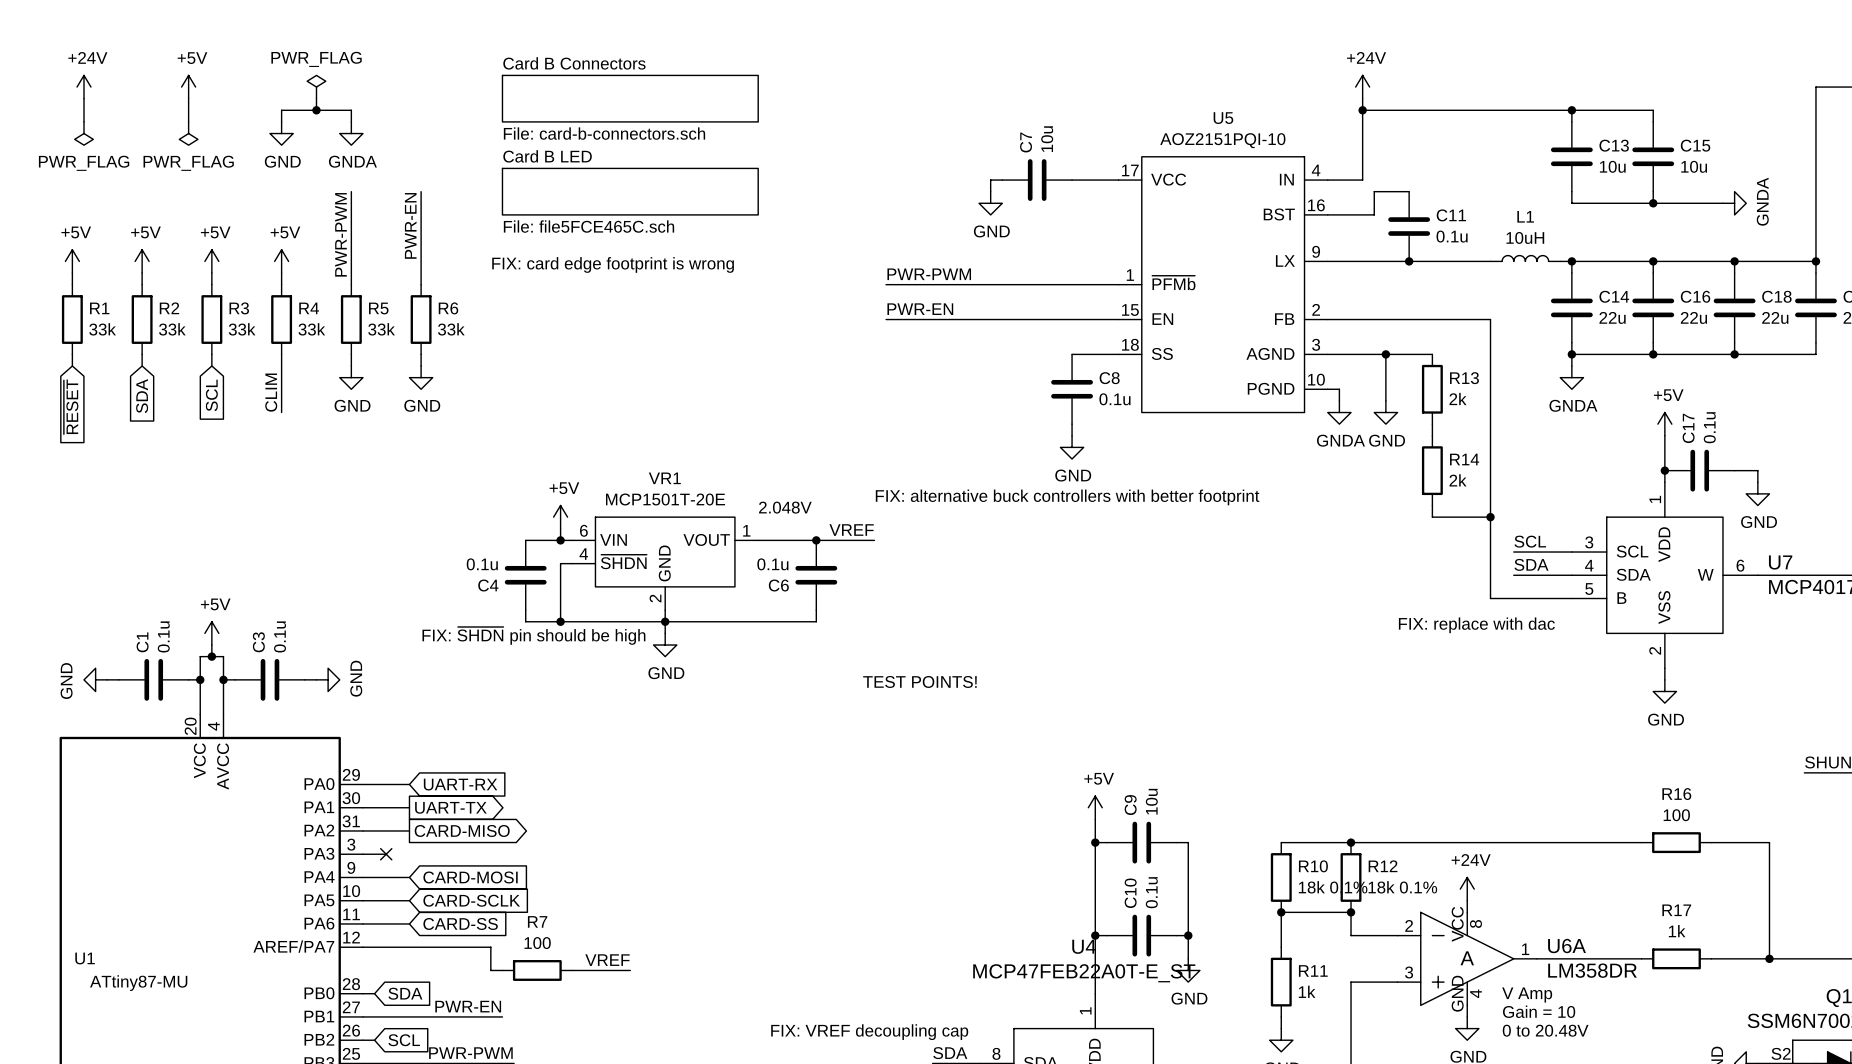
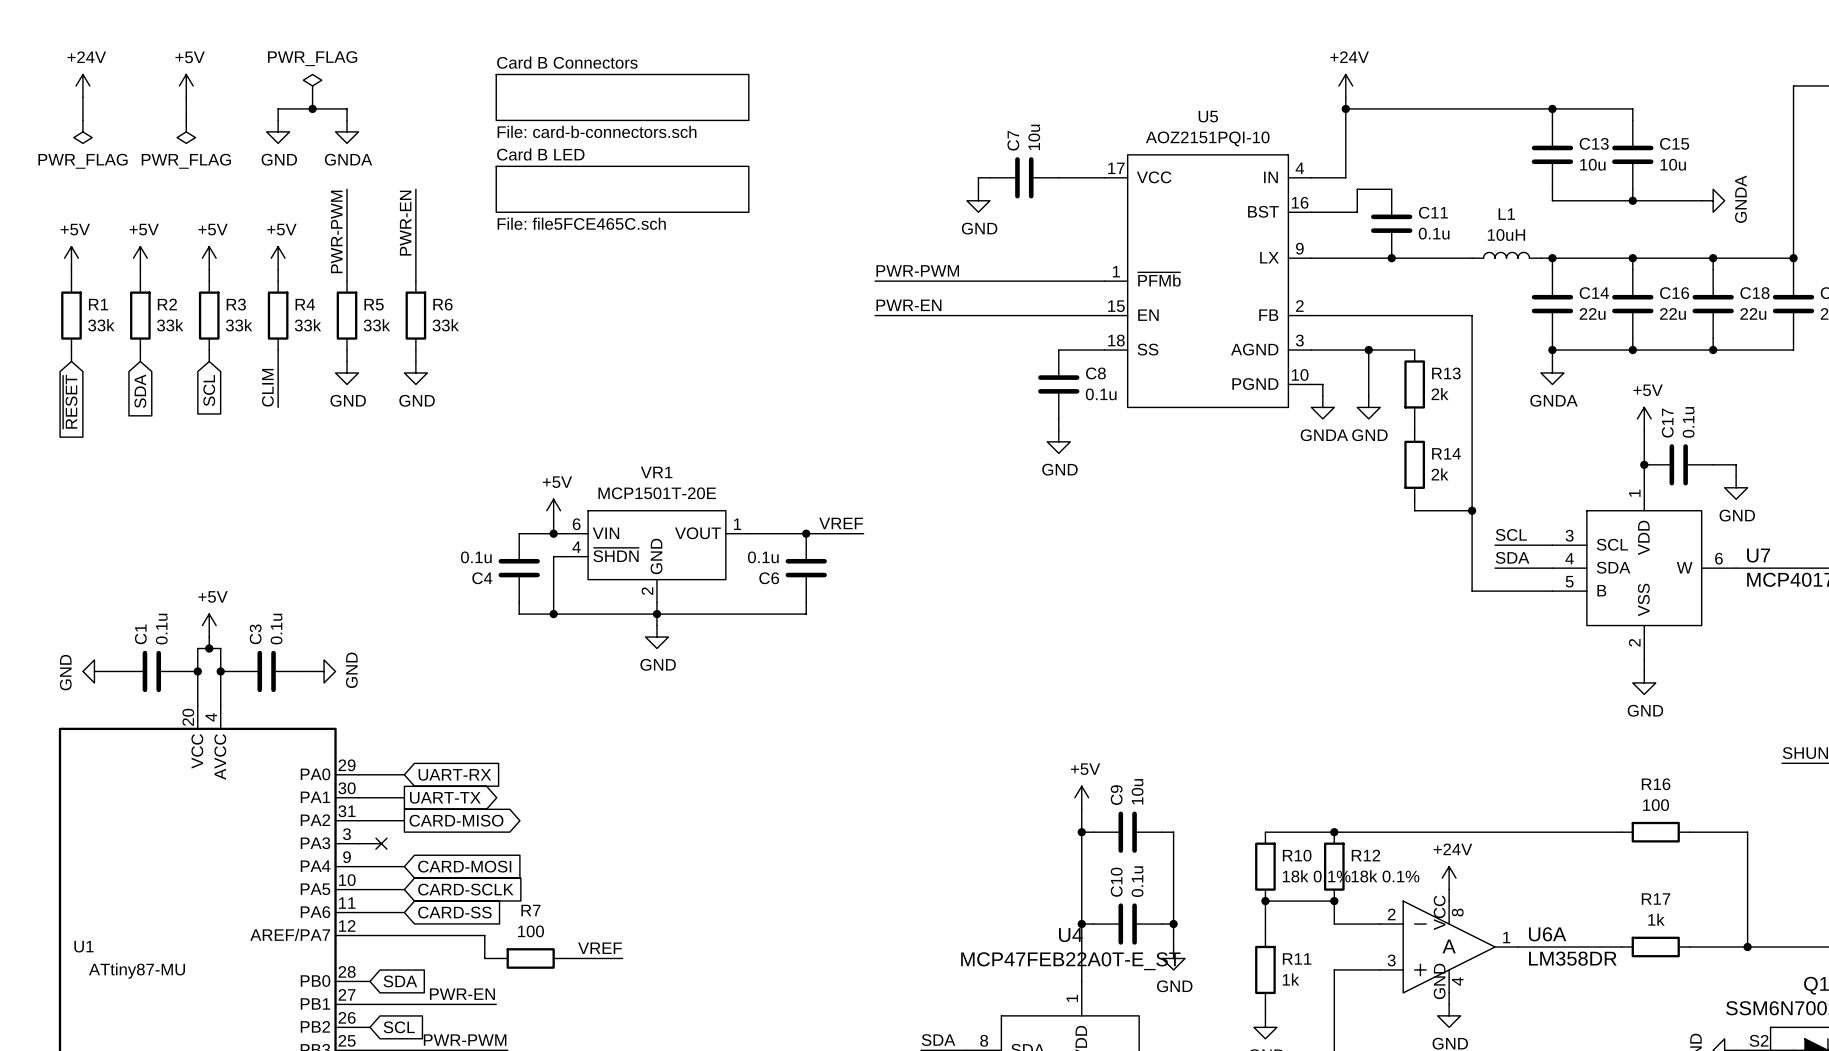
text: FIX: card edge footprint is wrong (613, 264) -> none
text: FIX: alternative buck controllers with better footprint (1067, 497) -> none
text: 2.048V (785, 507) -> none
text: FIX: replace with dac (1476, 625) -> none
text: FIX: ~{SHDN} pin should be high (533, 635) -> none
text: TEST POINTS! (919, 681) -> none
text: V Amp (1527, 995) -> none
text: Gain = 10 (1539, 1011) -> none
text: 0 to 20.48V (1545, 1030) -> none
text: FIX: VREF decoupling cap (869, 1032) -> none

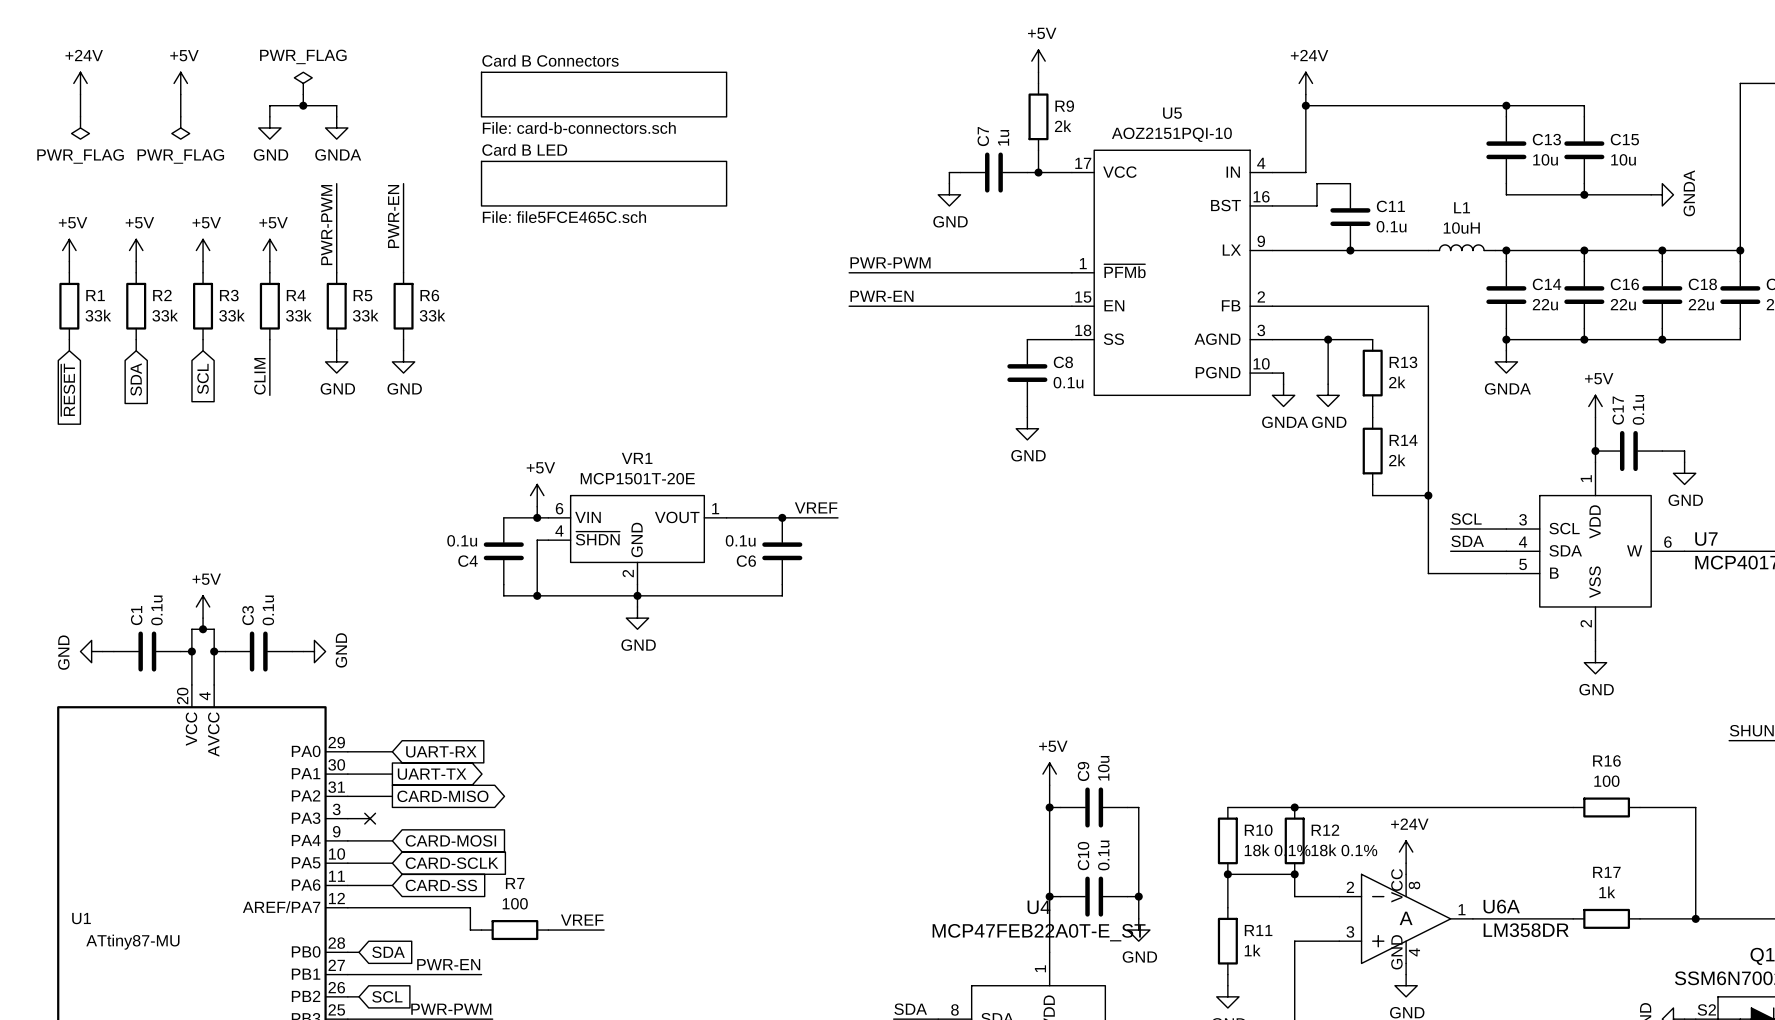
power symbol: none -> +5V (1038, 61)
wire: none -> (1038, 72) (1038, 83)
R9: none -> 2k (1038, 116)
C7 value: 10u (1034, 137) -> 1u (1003, 137)
wire: none -> (1038, 150) (1038, 172)
junction: none -> (1038, 172)

